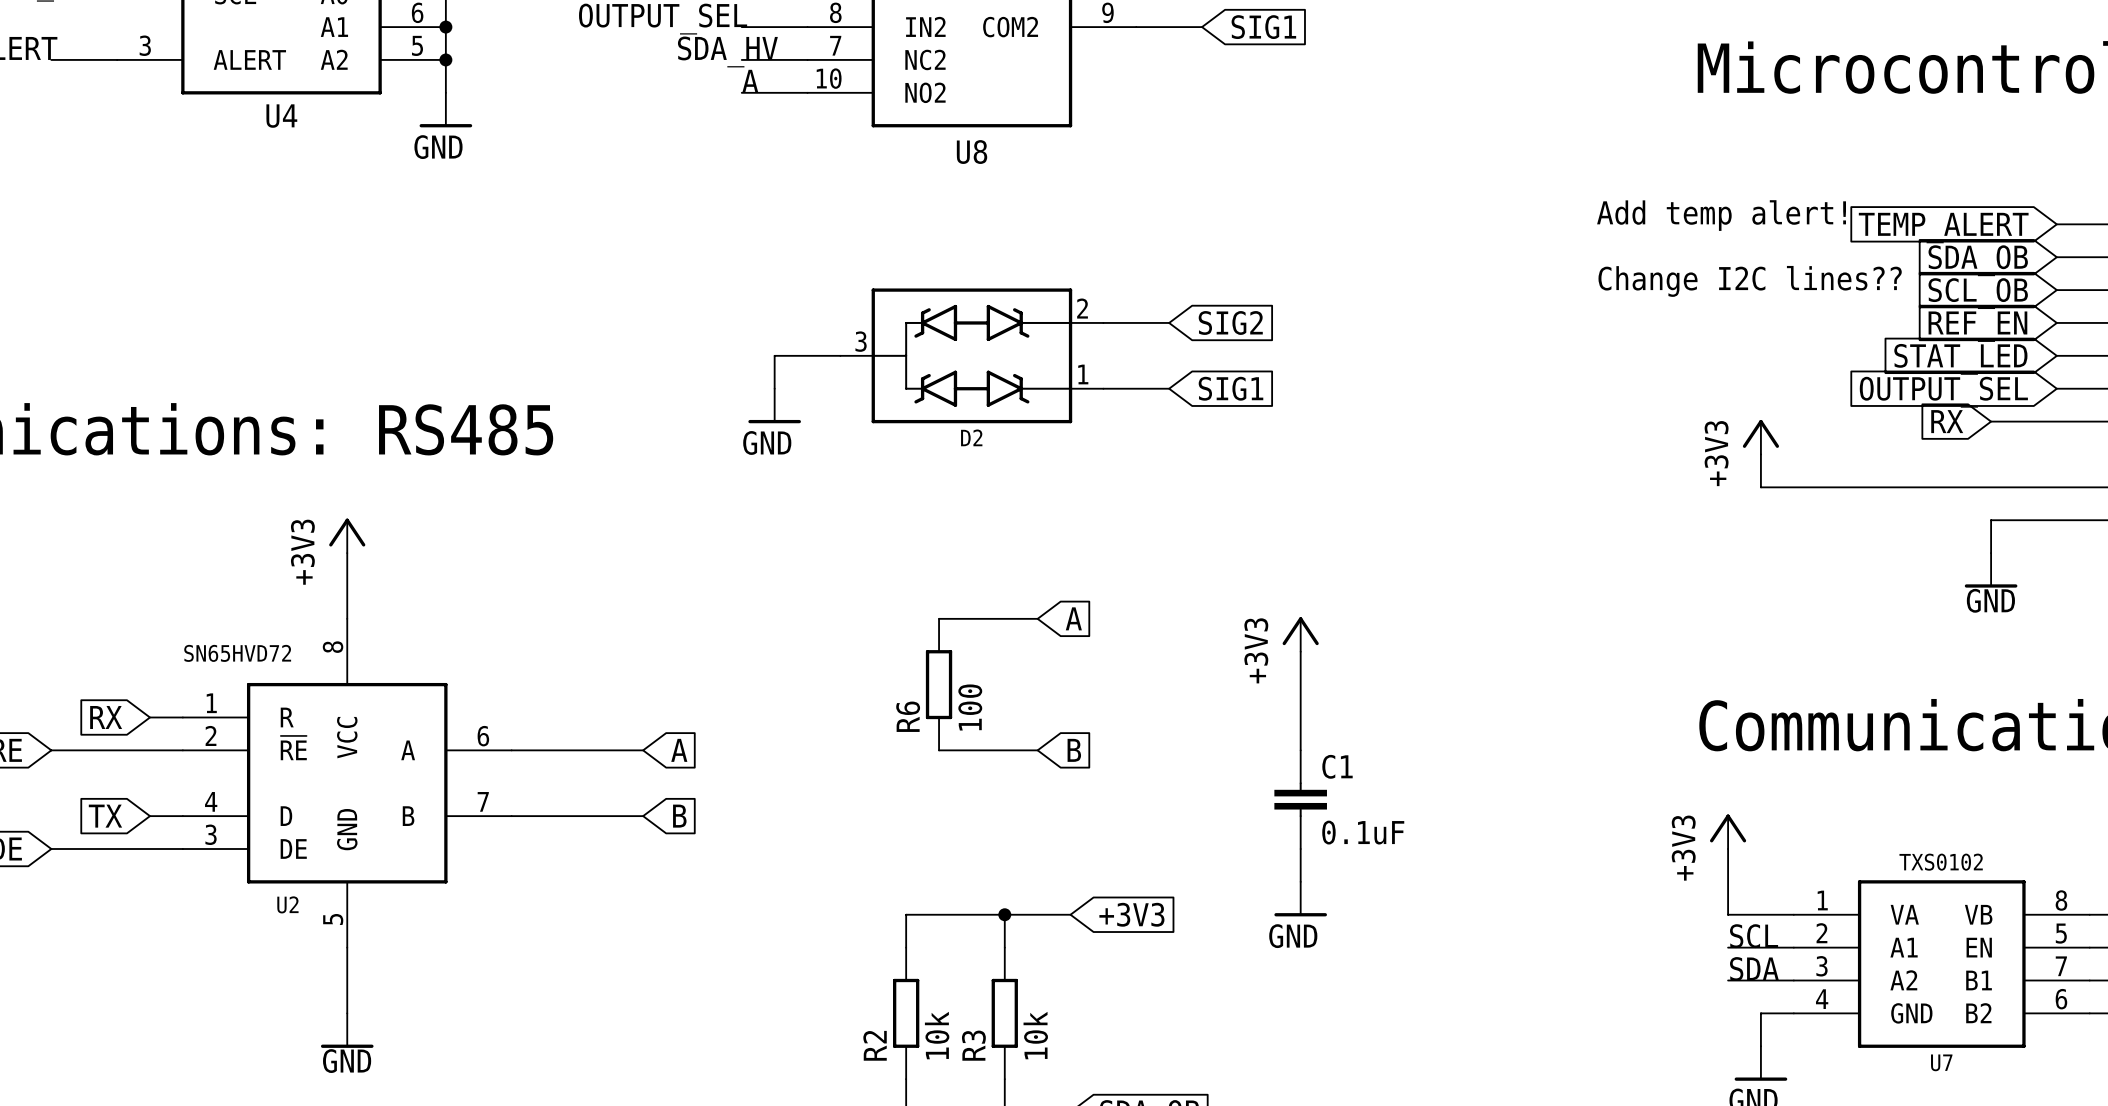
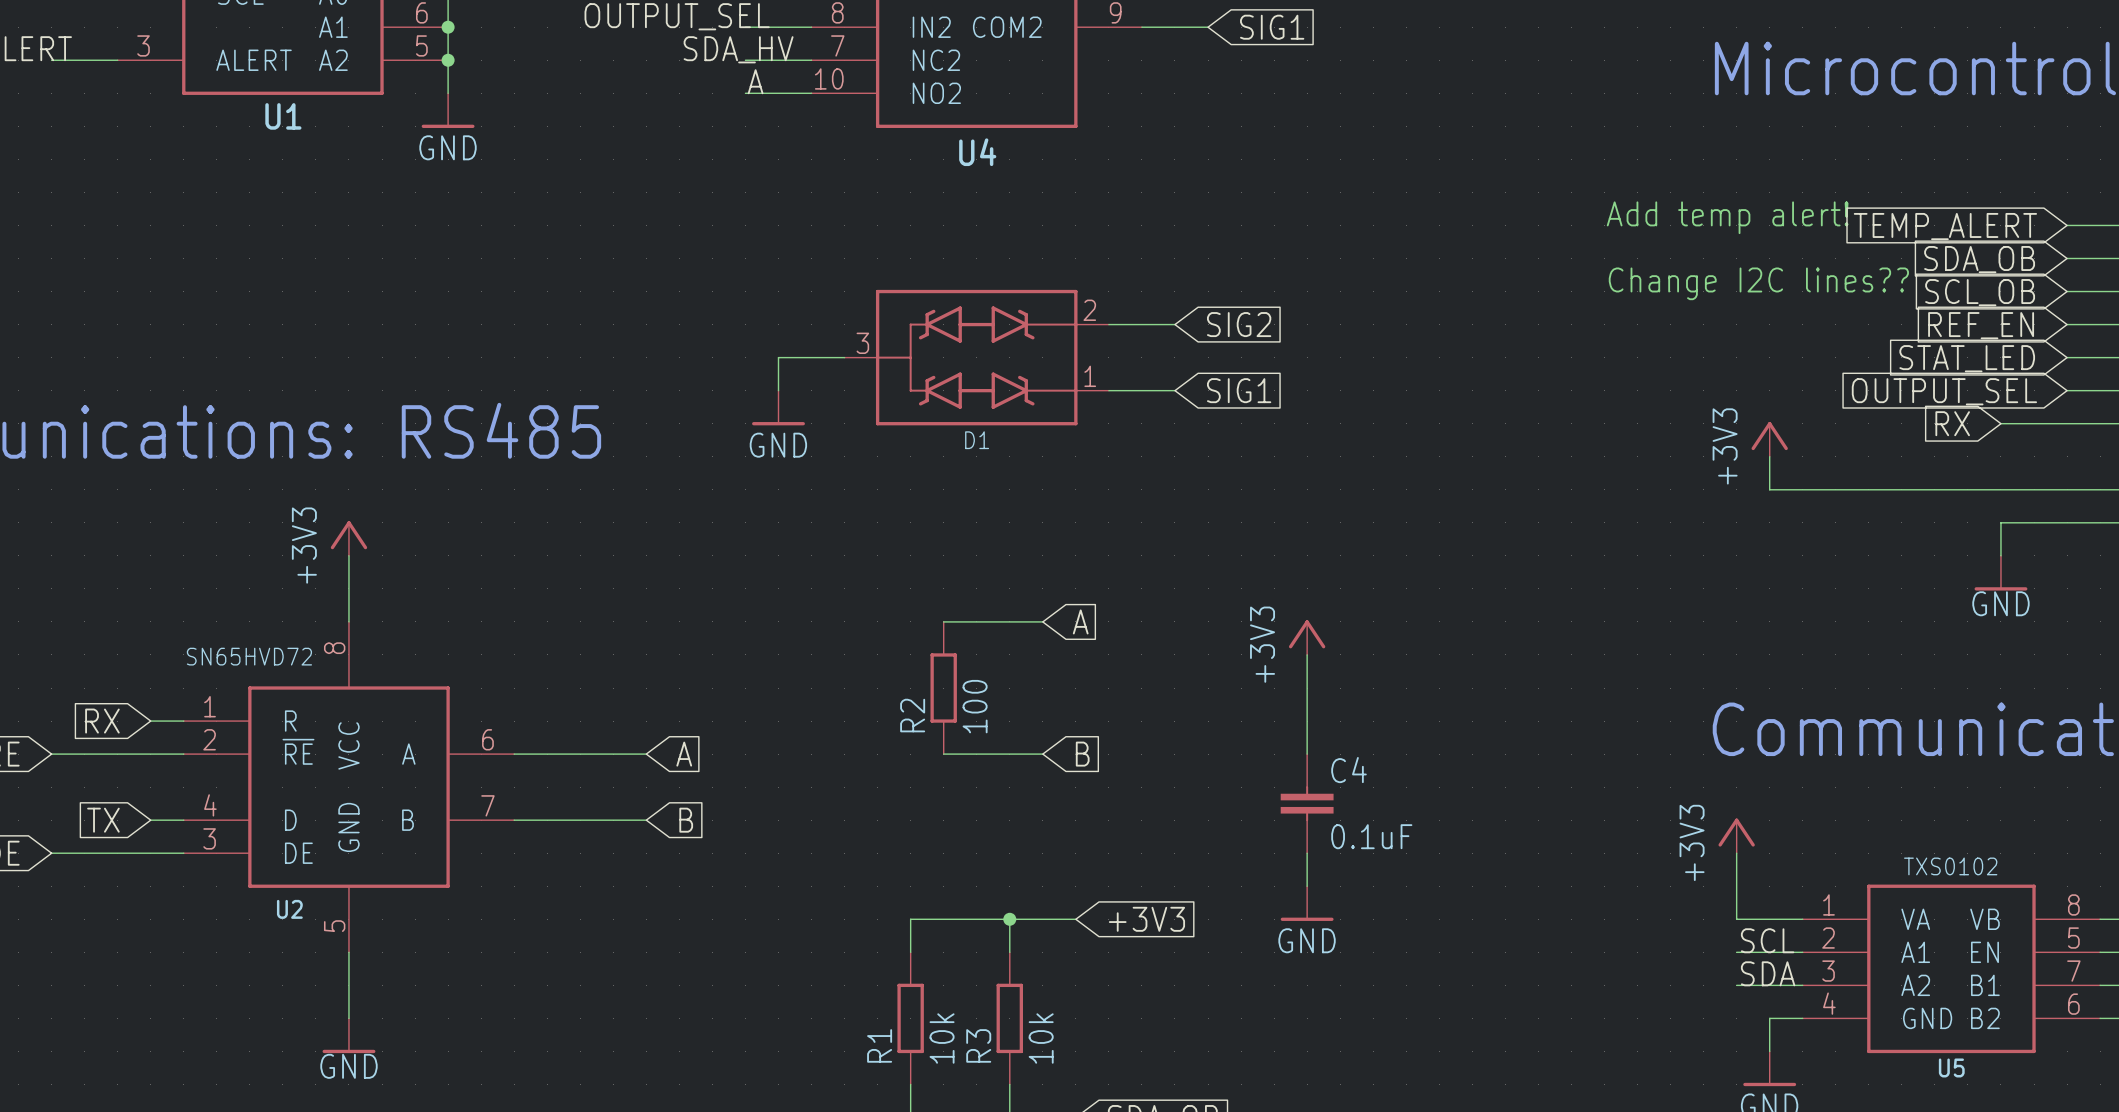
U4 name: U4 (281, 116) -> U1 (283, 116)
U8 name: U8 (972, 152) -> U4 (977, 152)
D2 name: D2 (971, 437) -> D1 (977, 440)
R6 name: R6 (908, 716) -> R2 (912, 715)
C1 name: C1 (1337, 766) -> C4 (1348, 770)
R2 name: R2 (875, 1045) -> R1 (879, 1045)
U7 name: U7 (1941, 1062) -> U5 (1951, 1067)

